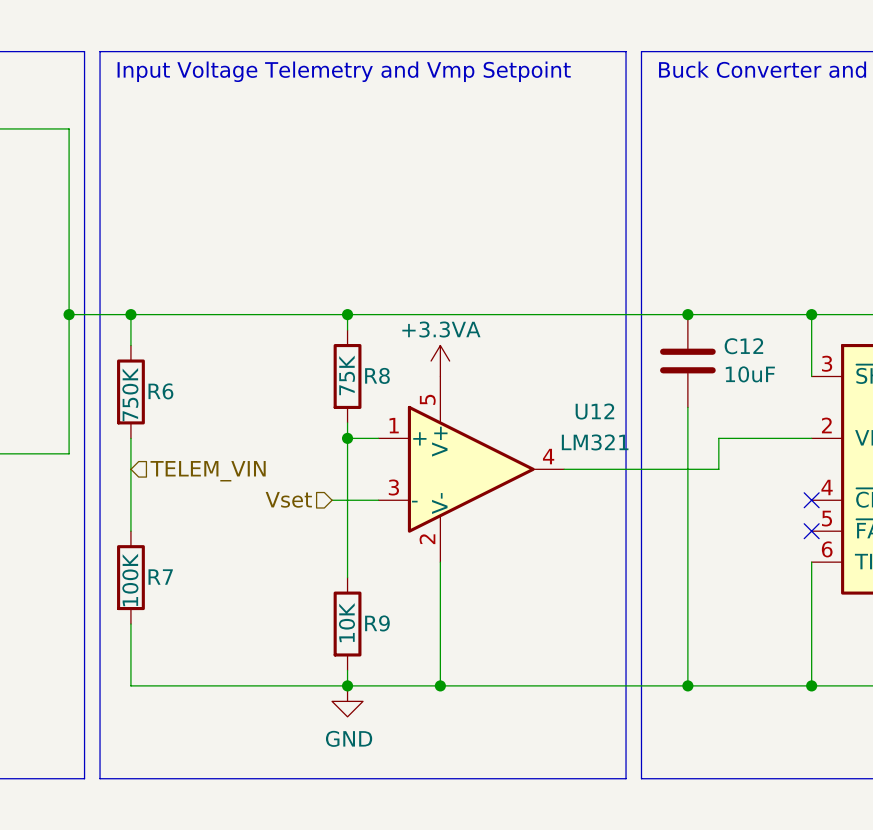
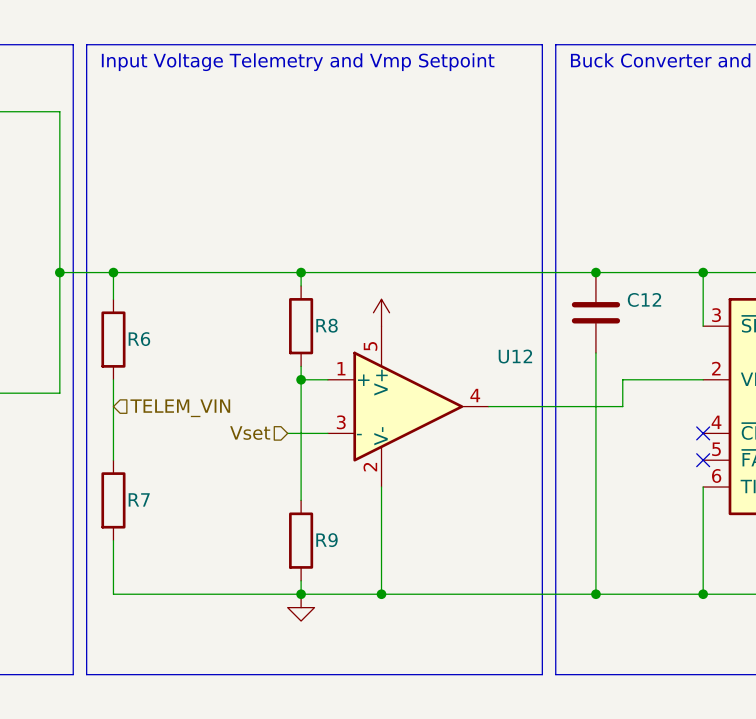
power symbol text: +3.3VA (441, 329) -> none
C12 value: 10uF (750, 374) -> none
R8 value: 75K (347, 375) -> none
R6 value: 750K (130, 394) -> none
U12 value: LM321 (595, 442) -> none
R7 value: 100K (130, 579) -> none
R9 value: 10K (346, 622) -> none
power symbol text: GND (349, 738) -> none

